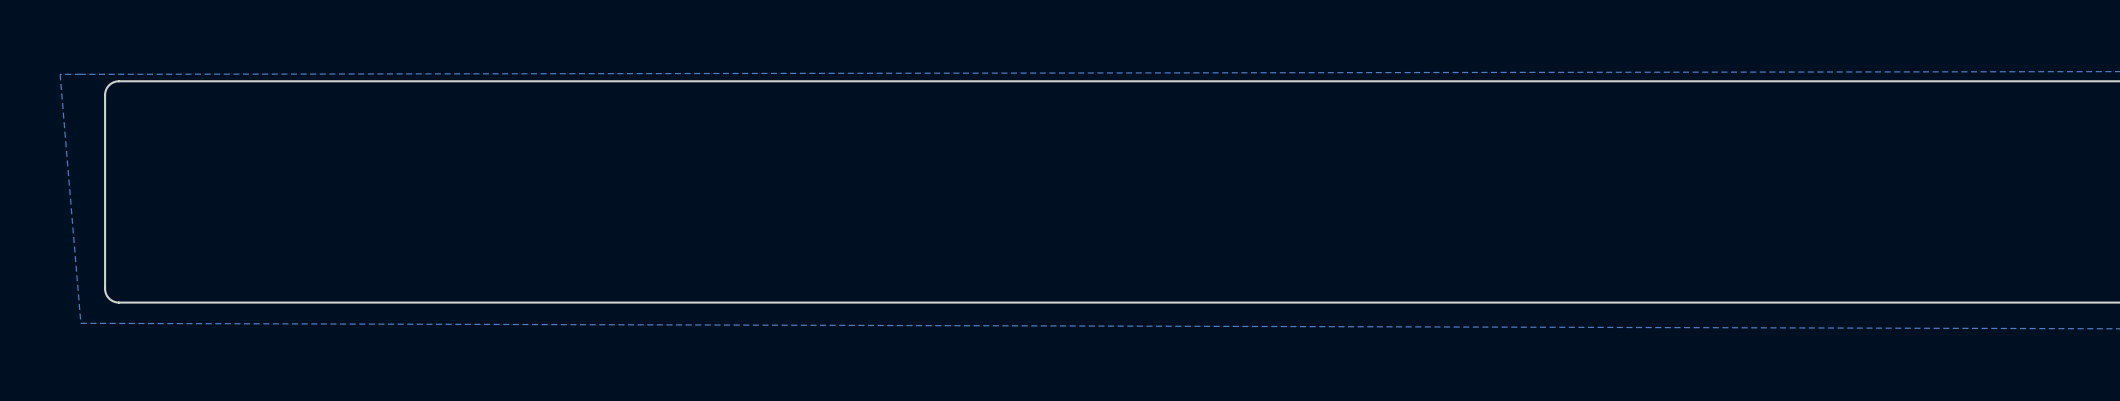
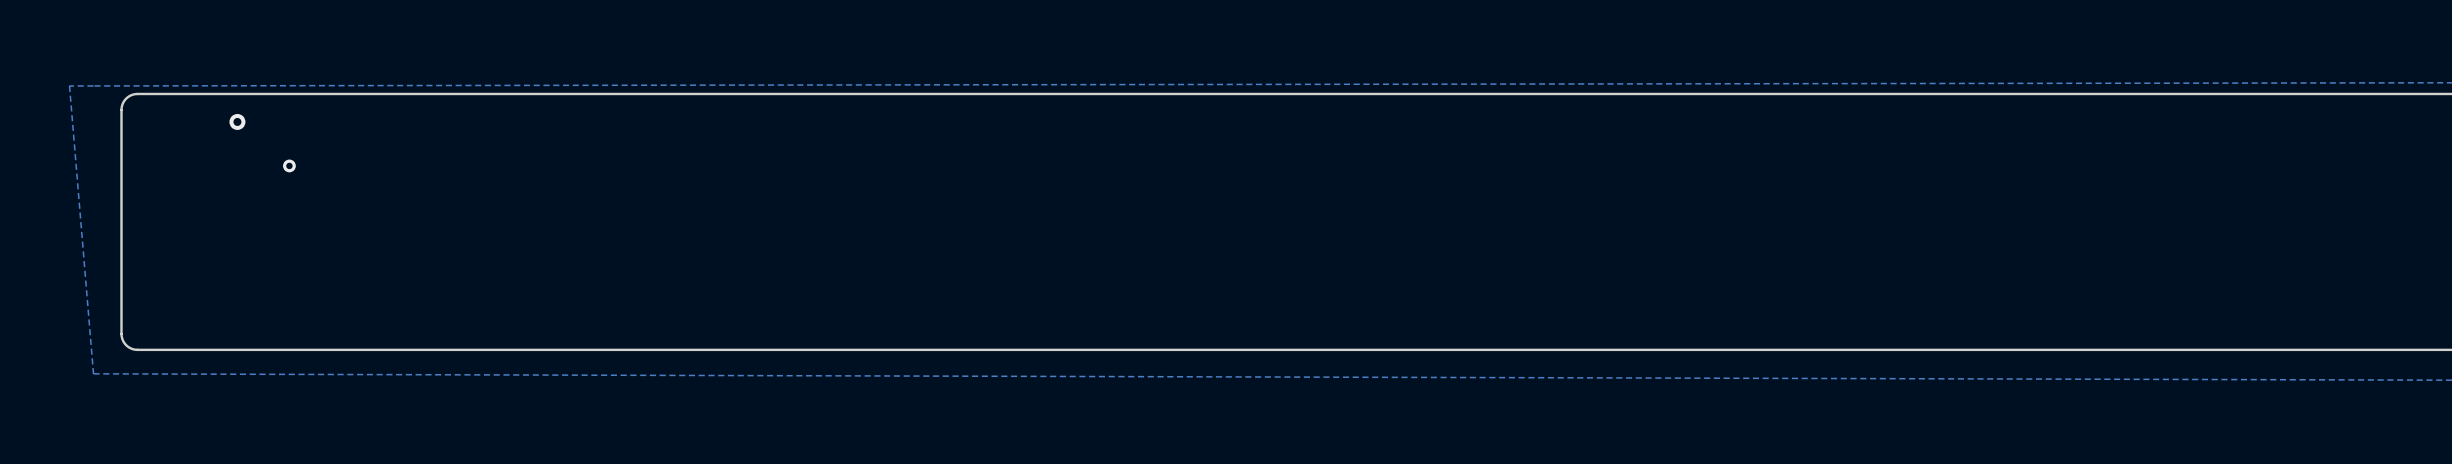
via: none -> (237, 121)
via: none -> (289, 165)

